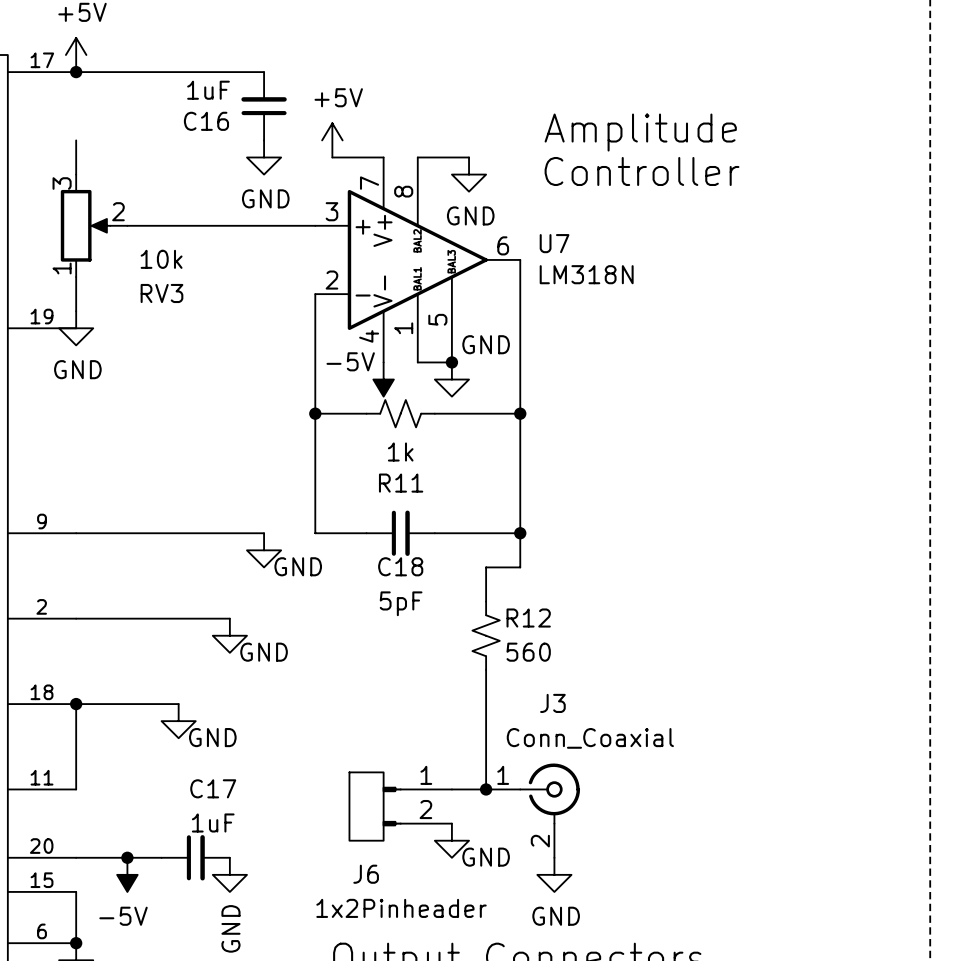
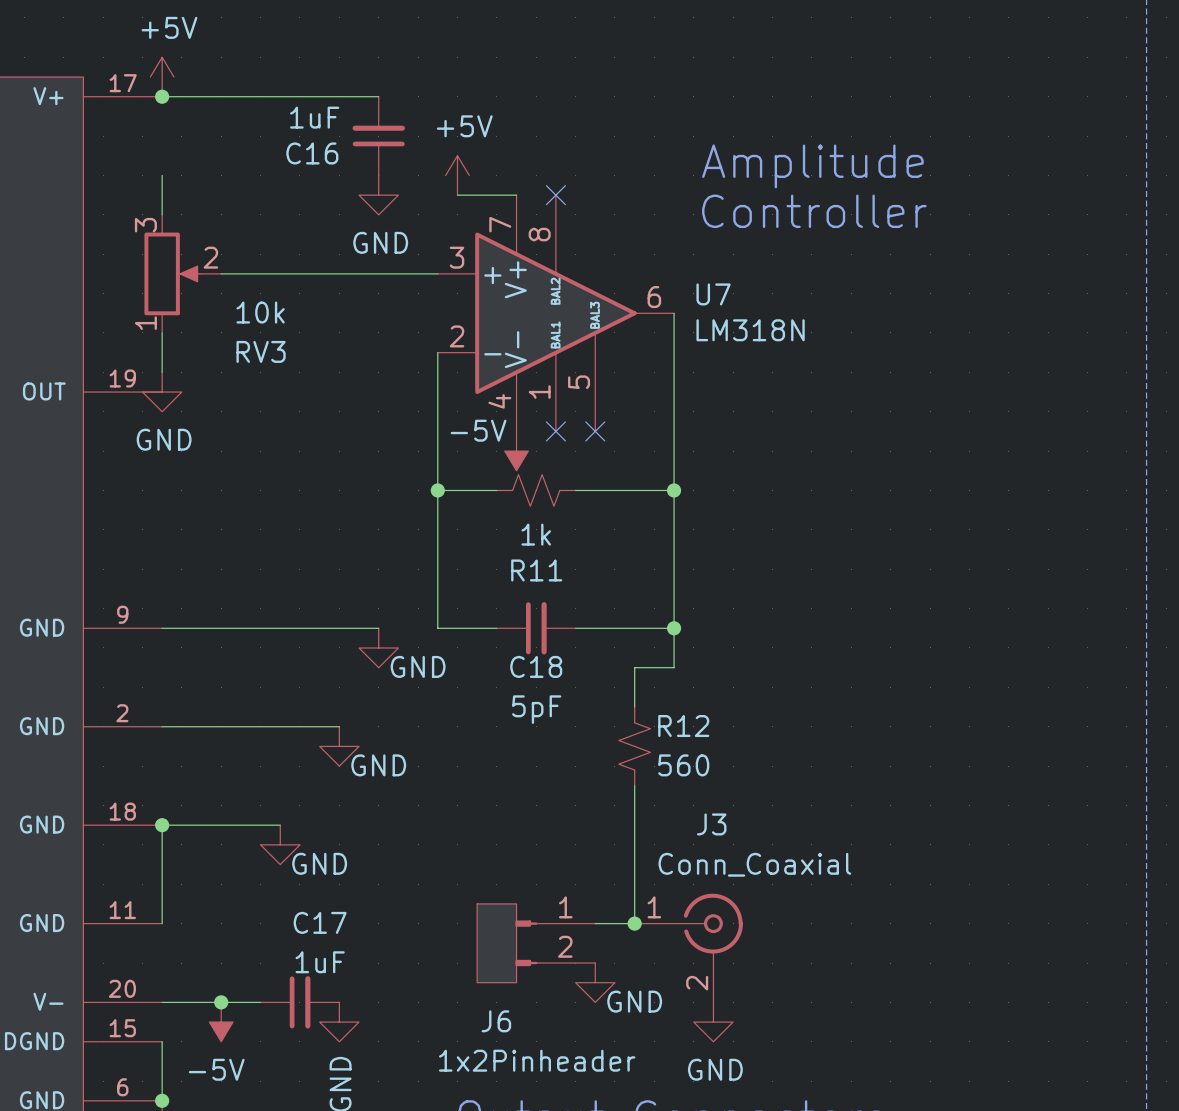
wire: (417, 157) (469, 157) -> none
no-connect mark: none -> (555, 195)
power symbol: GND (469, 174) -> none
wire: (417, 362) (451, 362) -> none
no-connect mark: none -> (555, 431)
junction: (451, 362) -> none
no-connect mark: none -> (595, 431)
power symbol: GND (451, 379) -> none

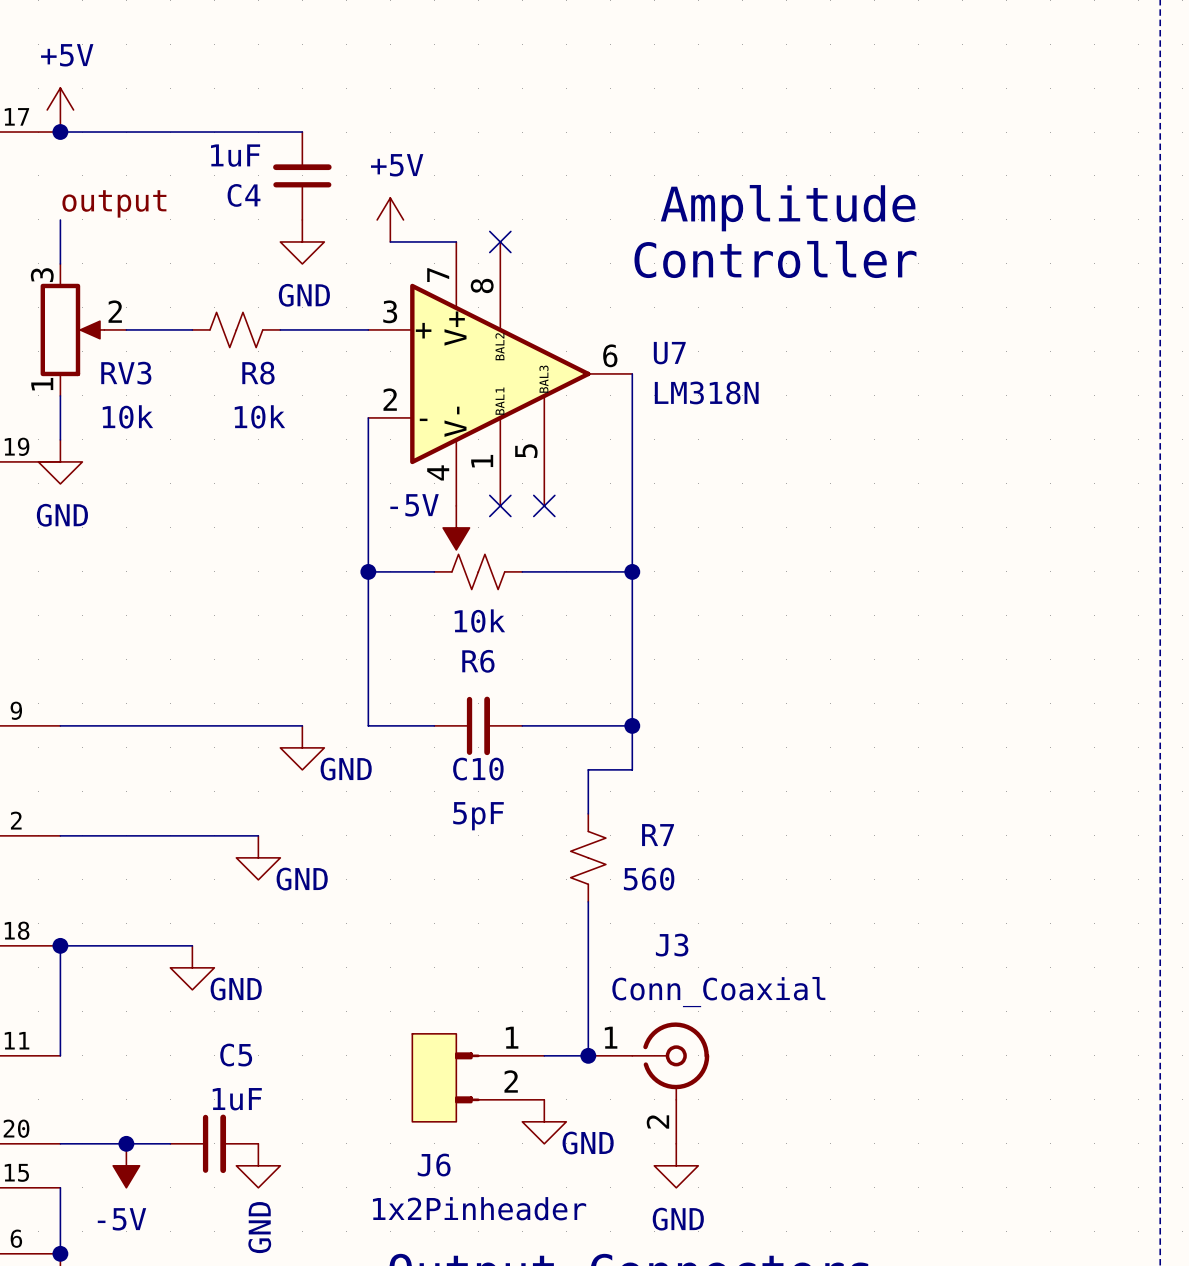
C16 name: C16 (312, 153) -> C4 (244, 195)
label: none -> output (114, 203)
wire: (280, 273) (359, 273) -> none
R8: none -> 10k (236, 329)
RV3 value position: 10k (260, 312) -> 10k (127, 416)
RV3 name position: RV3 (261, 351) -> RV3 (126, 373)
R11 value: 1k (536, 534) -> 10k (479, 621)
R11 name: R11 (536, 570) -> R6 (478, 661)
C18 name: C18 (536, 666) -> C10 (478, 769)
R12 name: R12 (683, 726) -> R7 (658, 835)
C17 name: C17 (320, 922) -> C5 (236, 1055)

